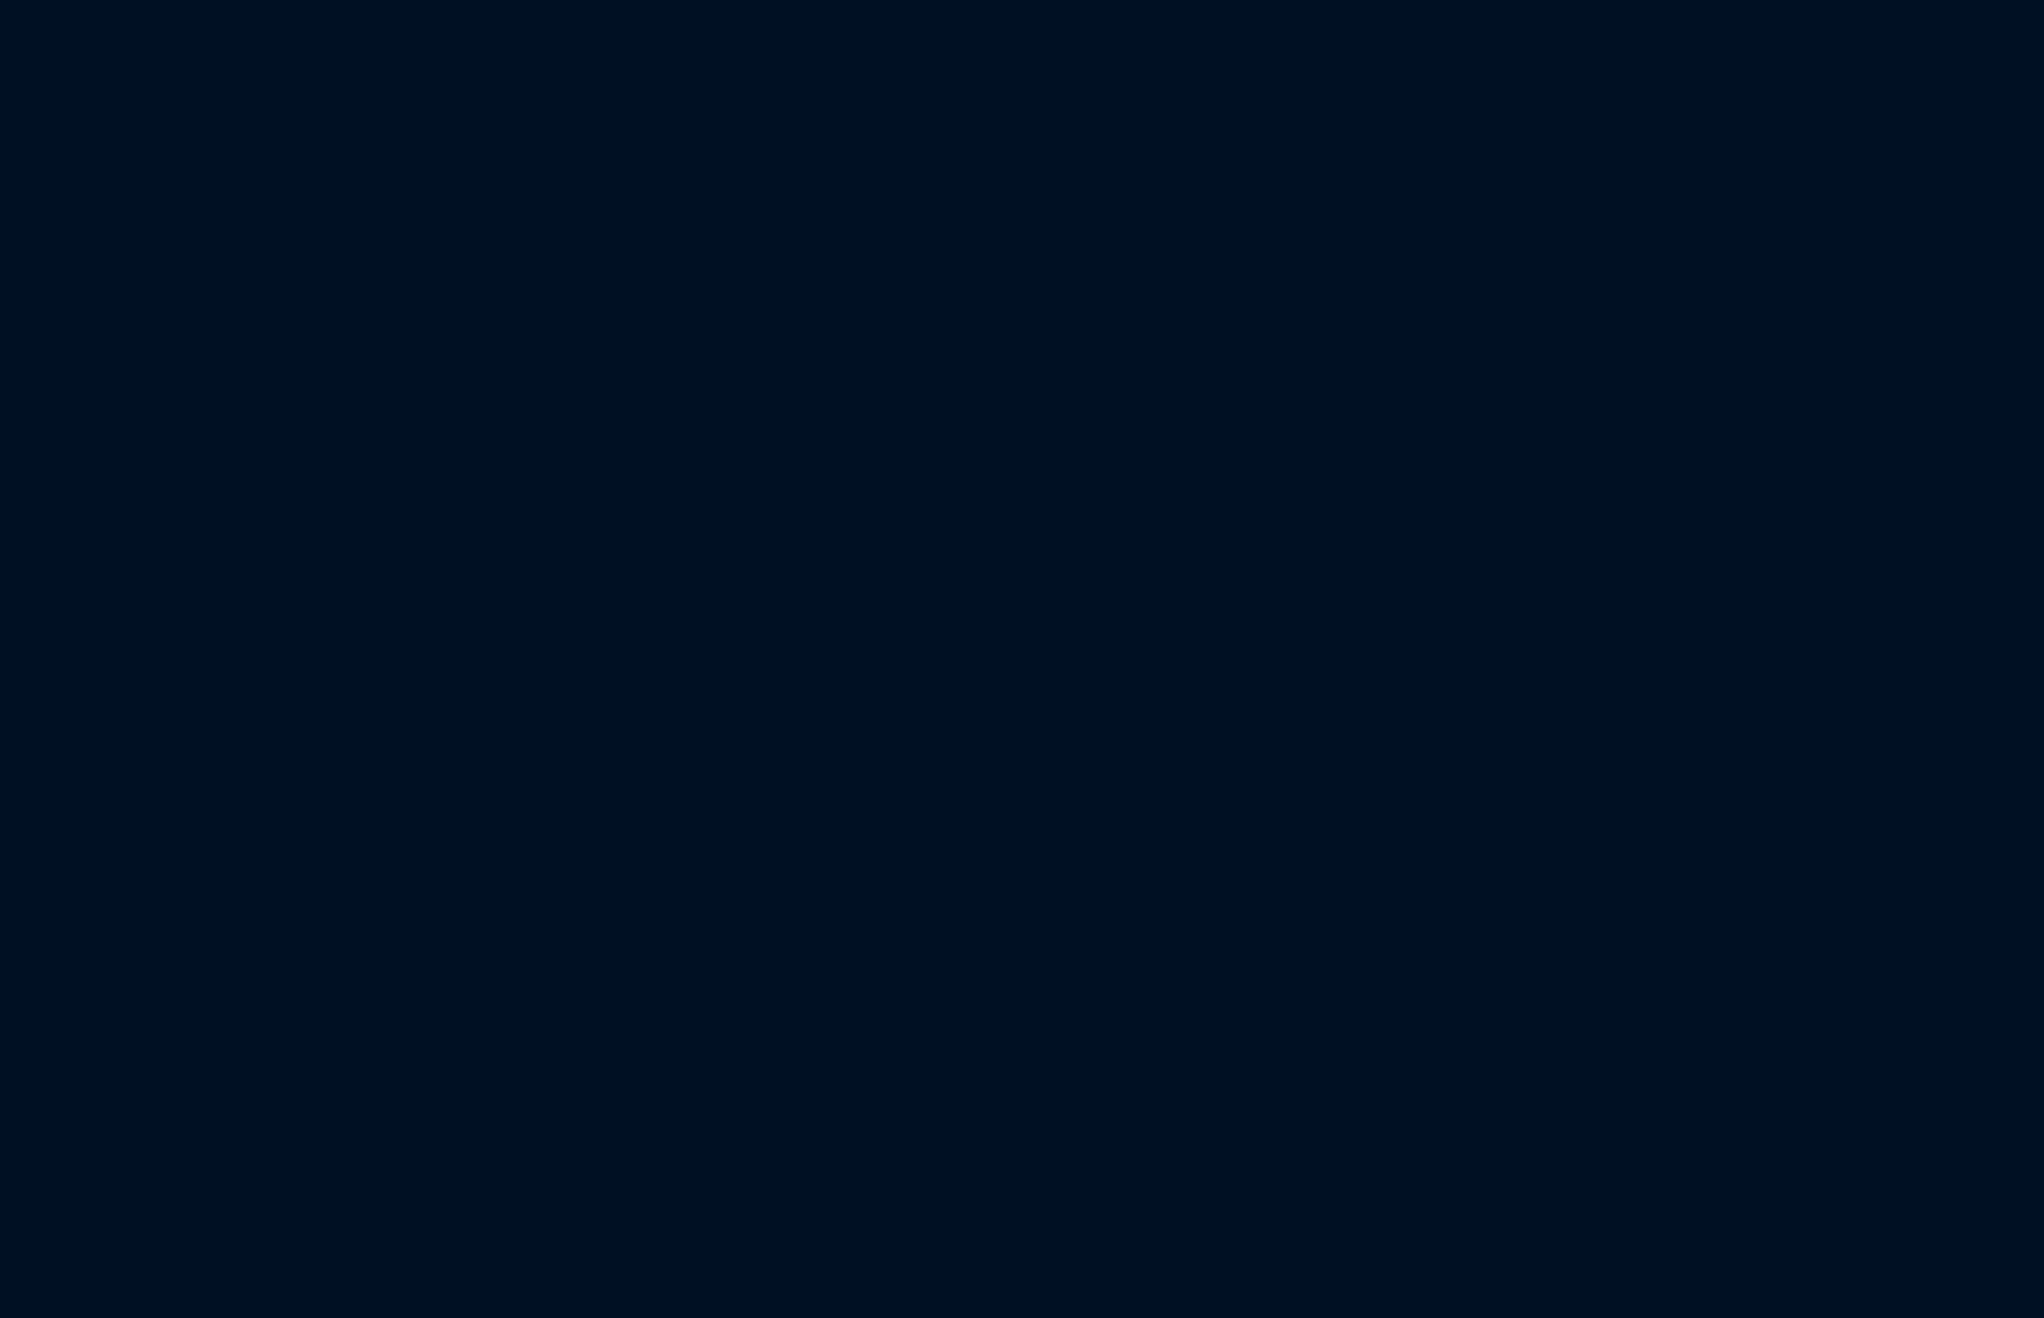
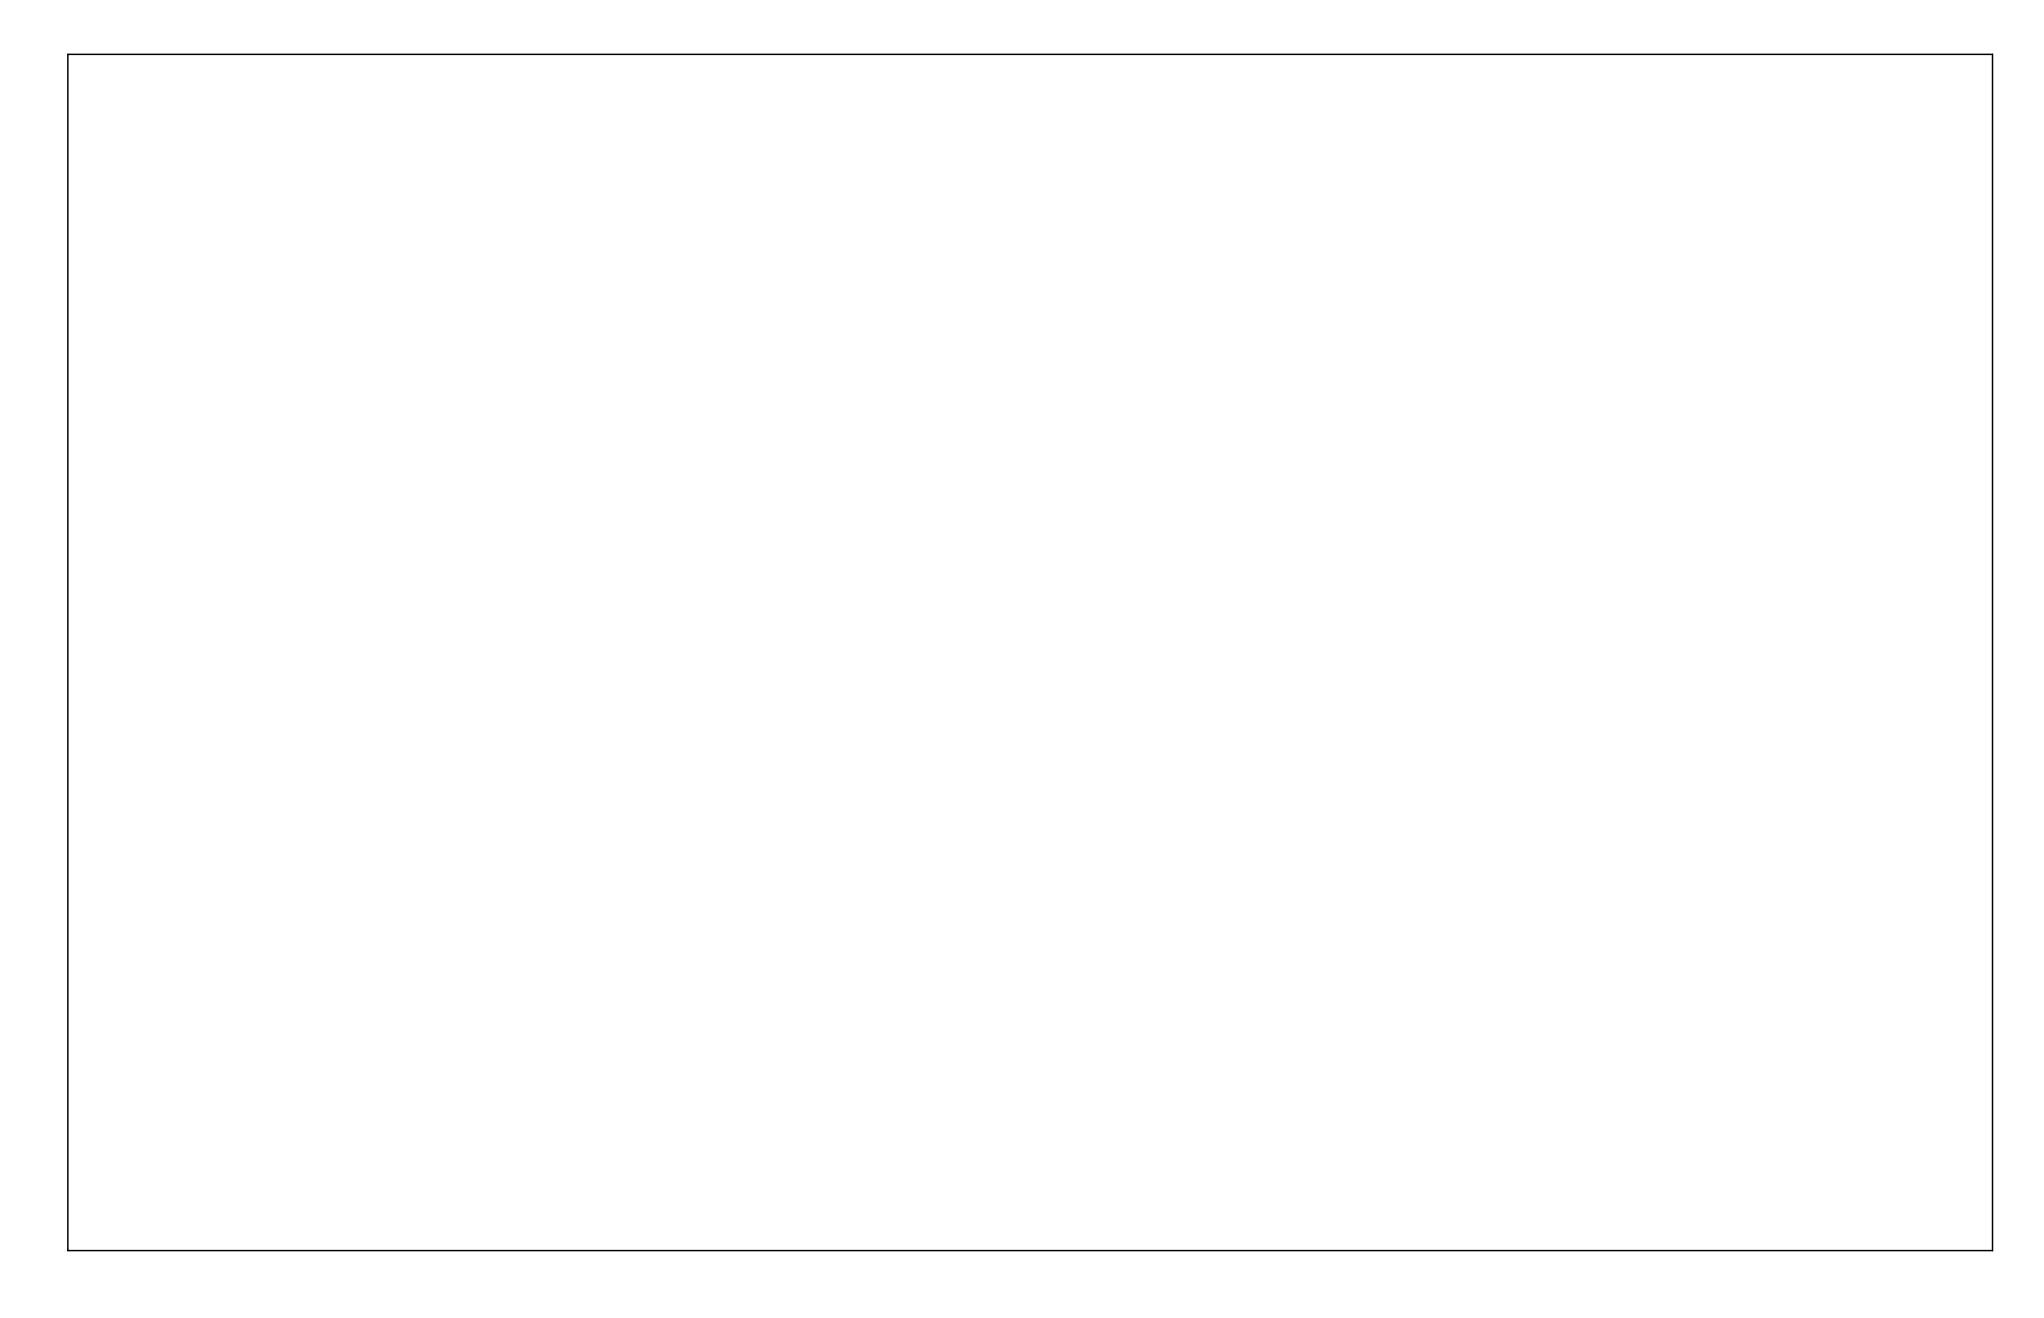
board edge: none -> (67, 54) (1992, 54) (1992, 1250) (67, 1250) (67, 54)

